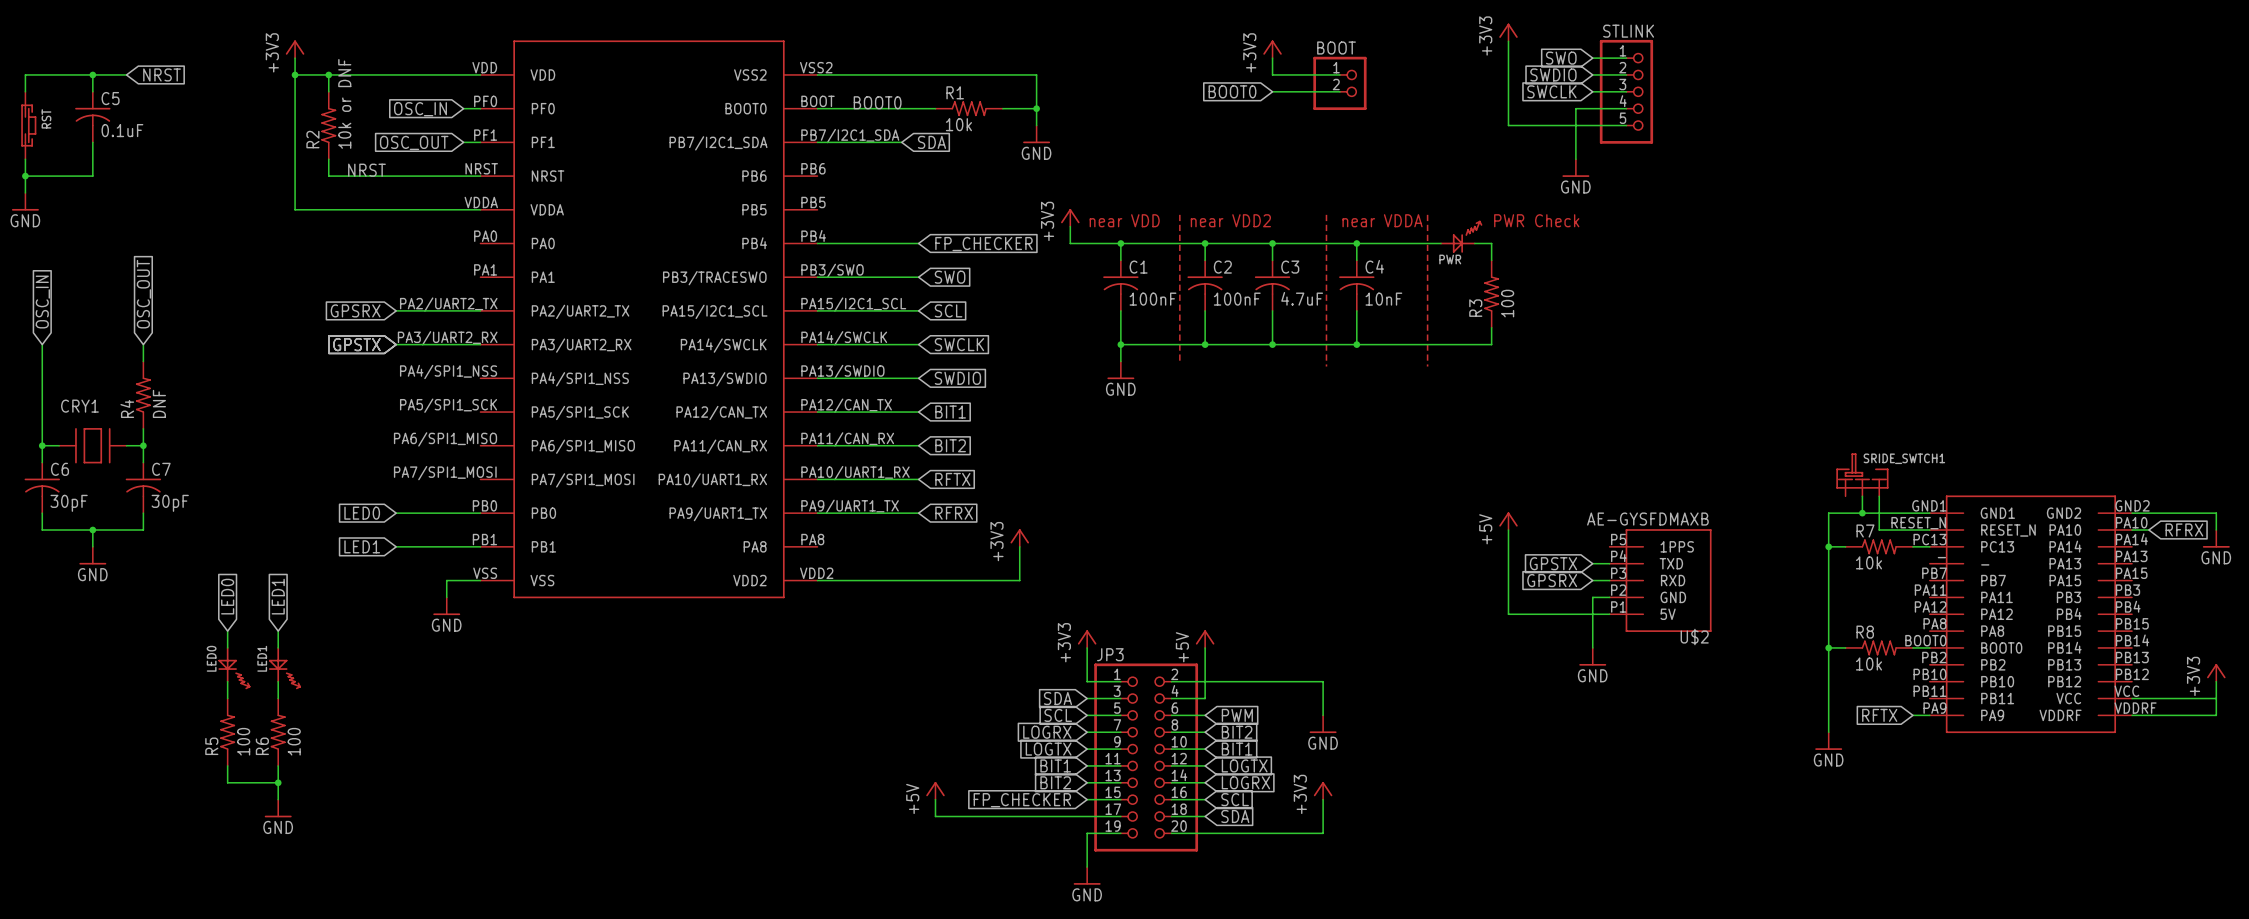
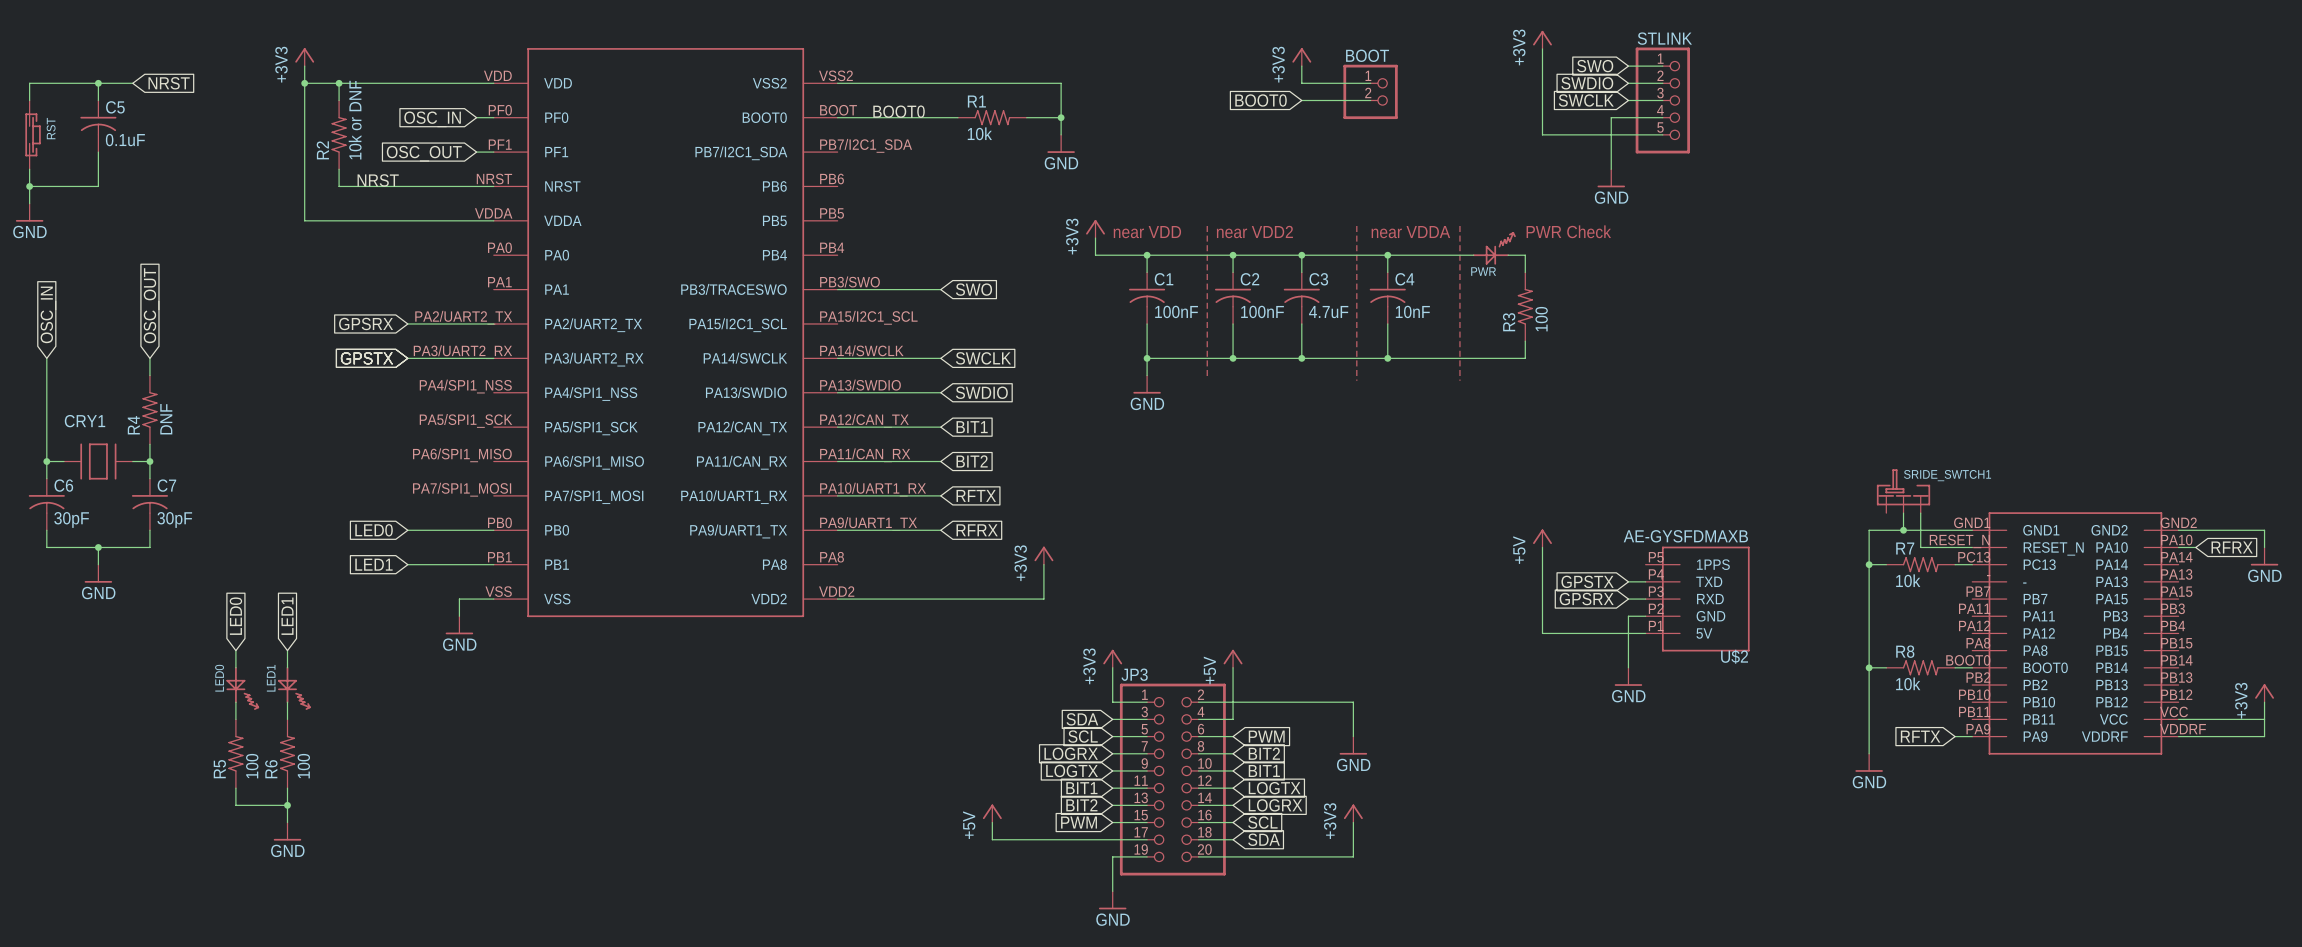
wire: (817, 142) (901, 142) -> none
global label: SDA (931, 142) -> none
wire: (817, 243) (918, 243) -> none
global label: FP_CHECKER (983, 244) -> none
wire: (817, 310) (918, 310) -> none
global label: SCL (948, 310) -> none
power symbol position: +5V (935, 790) -> +5V (992, 813)
wire: (935, 799) (935, 816) (969, 816) -> (992, 822) (992, 839)
global label: FP_CHECKER (1022, 800) -> PWM (1079, 822)

